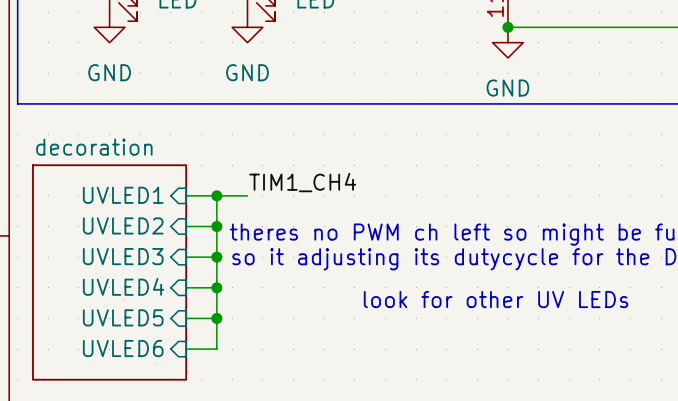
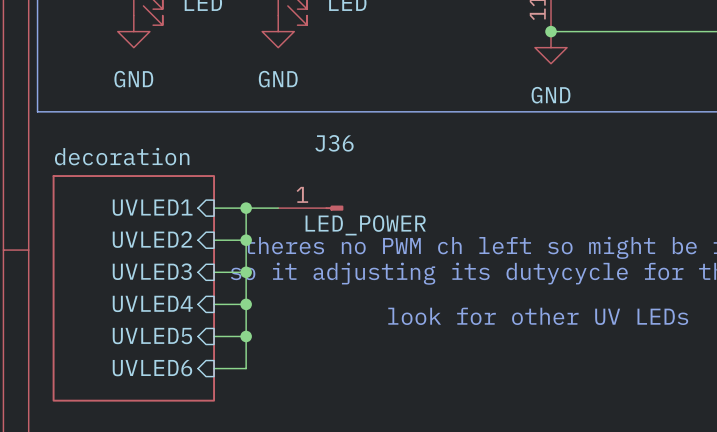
label: TIM1_CH4 (302, 182) -> none
J36: none -> LED_POWER (310, 208)

